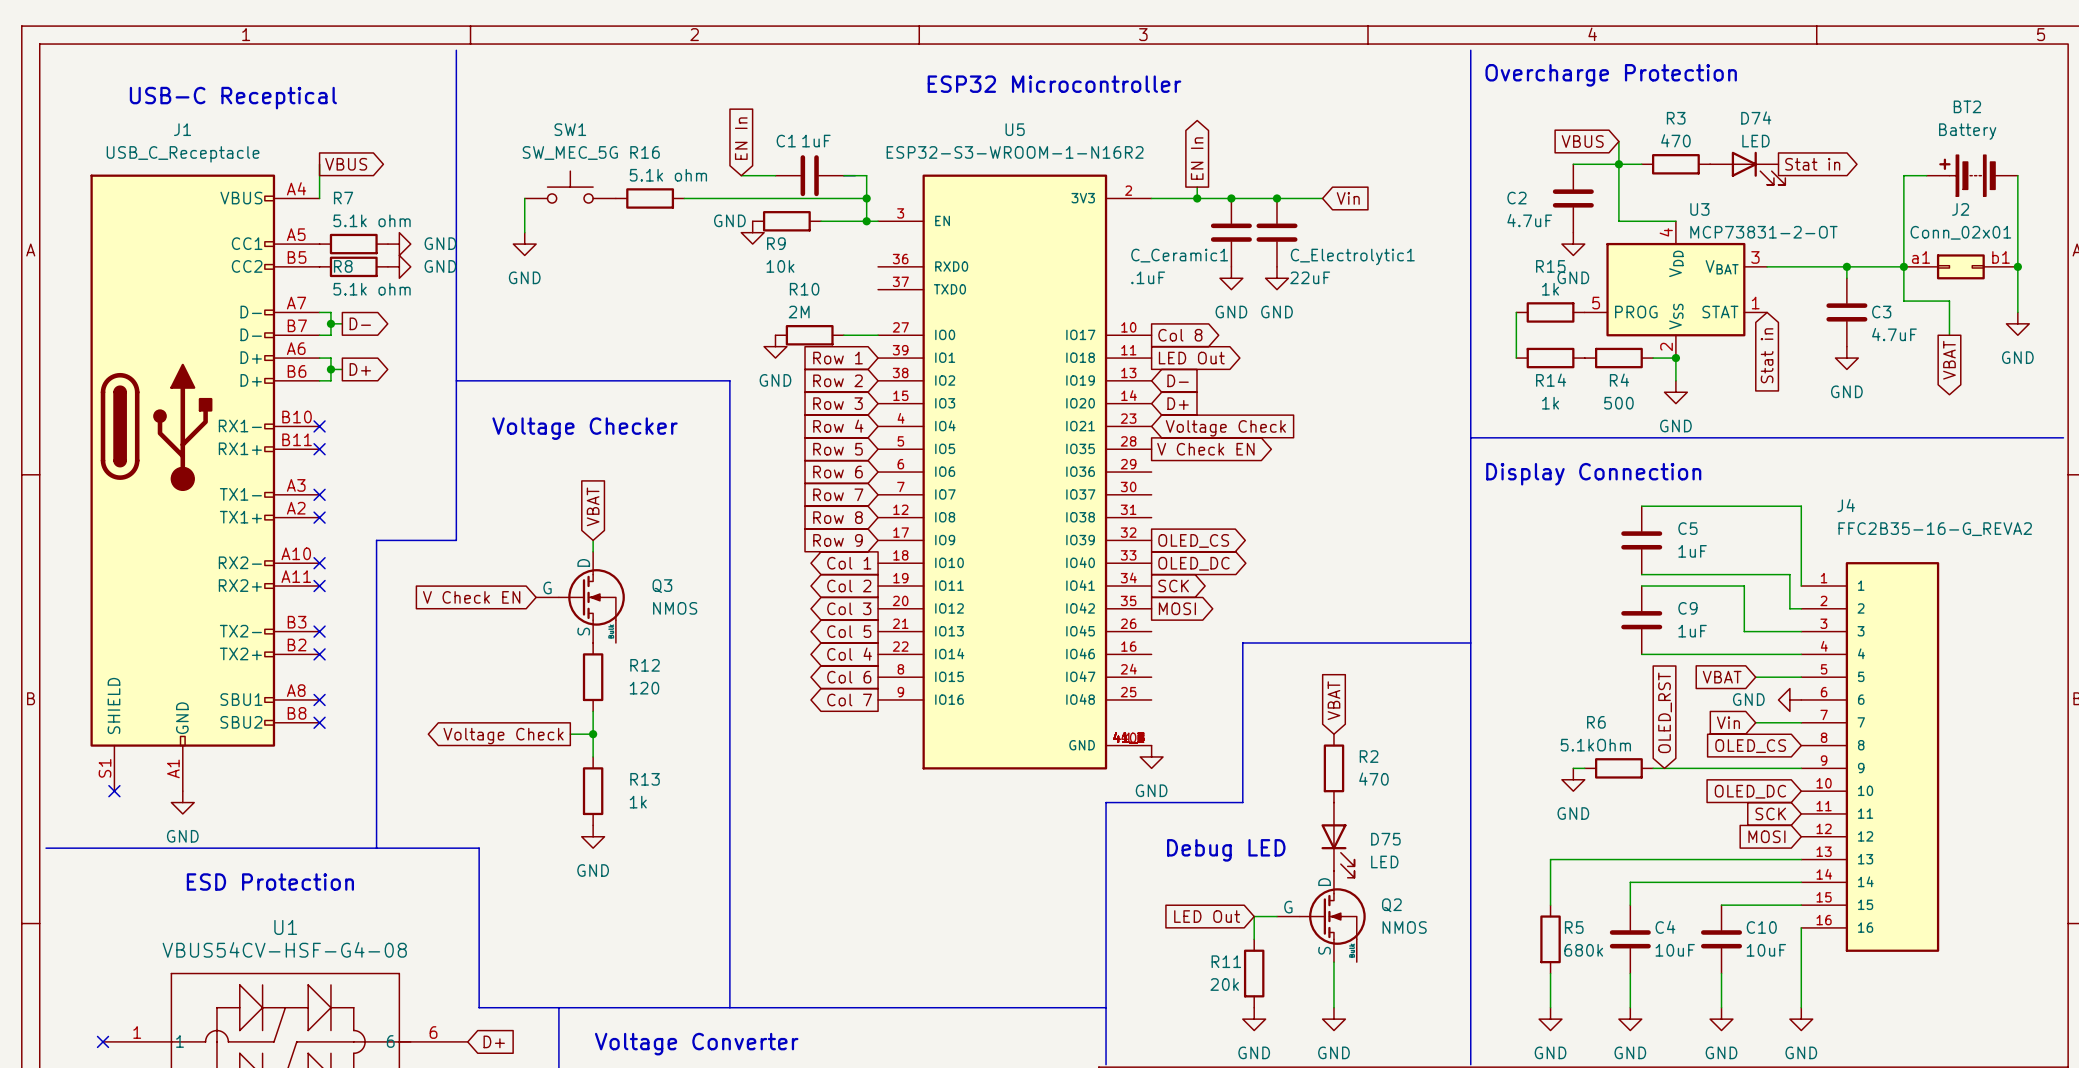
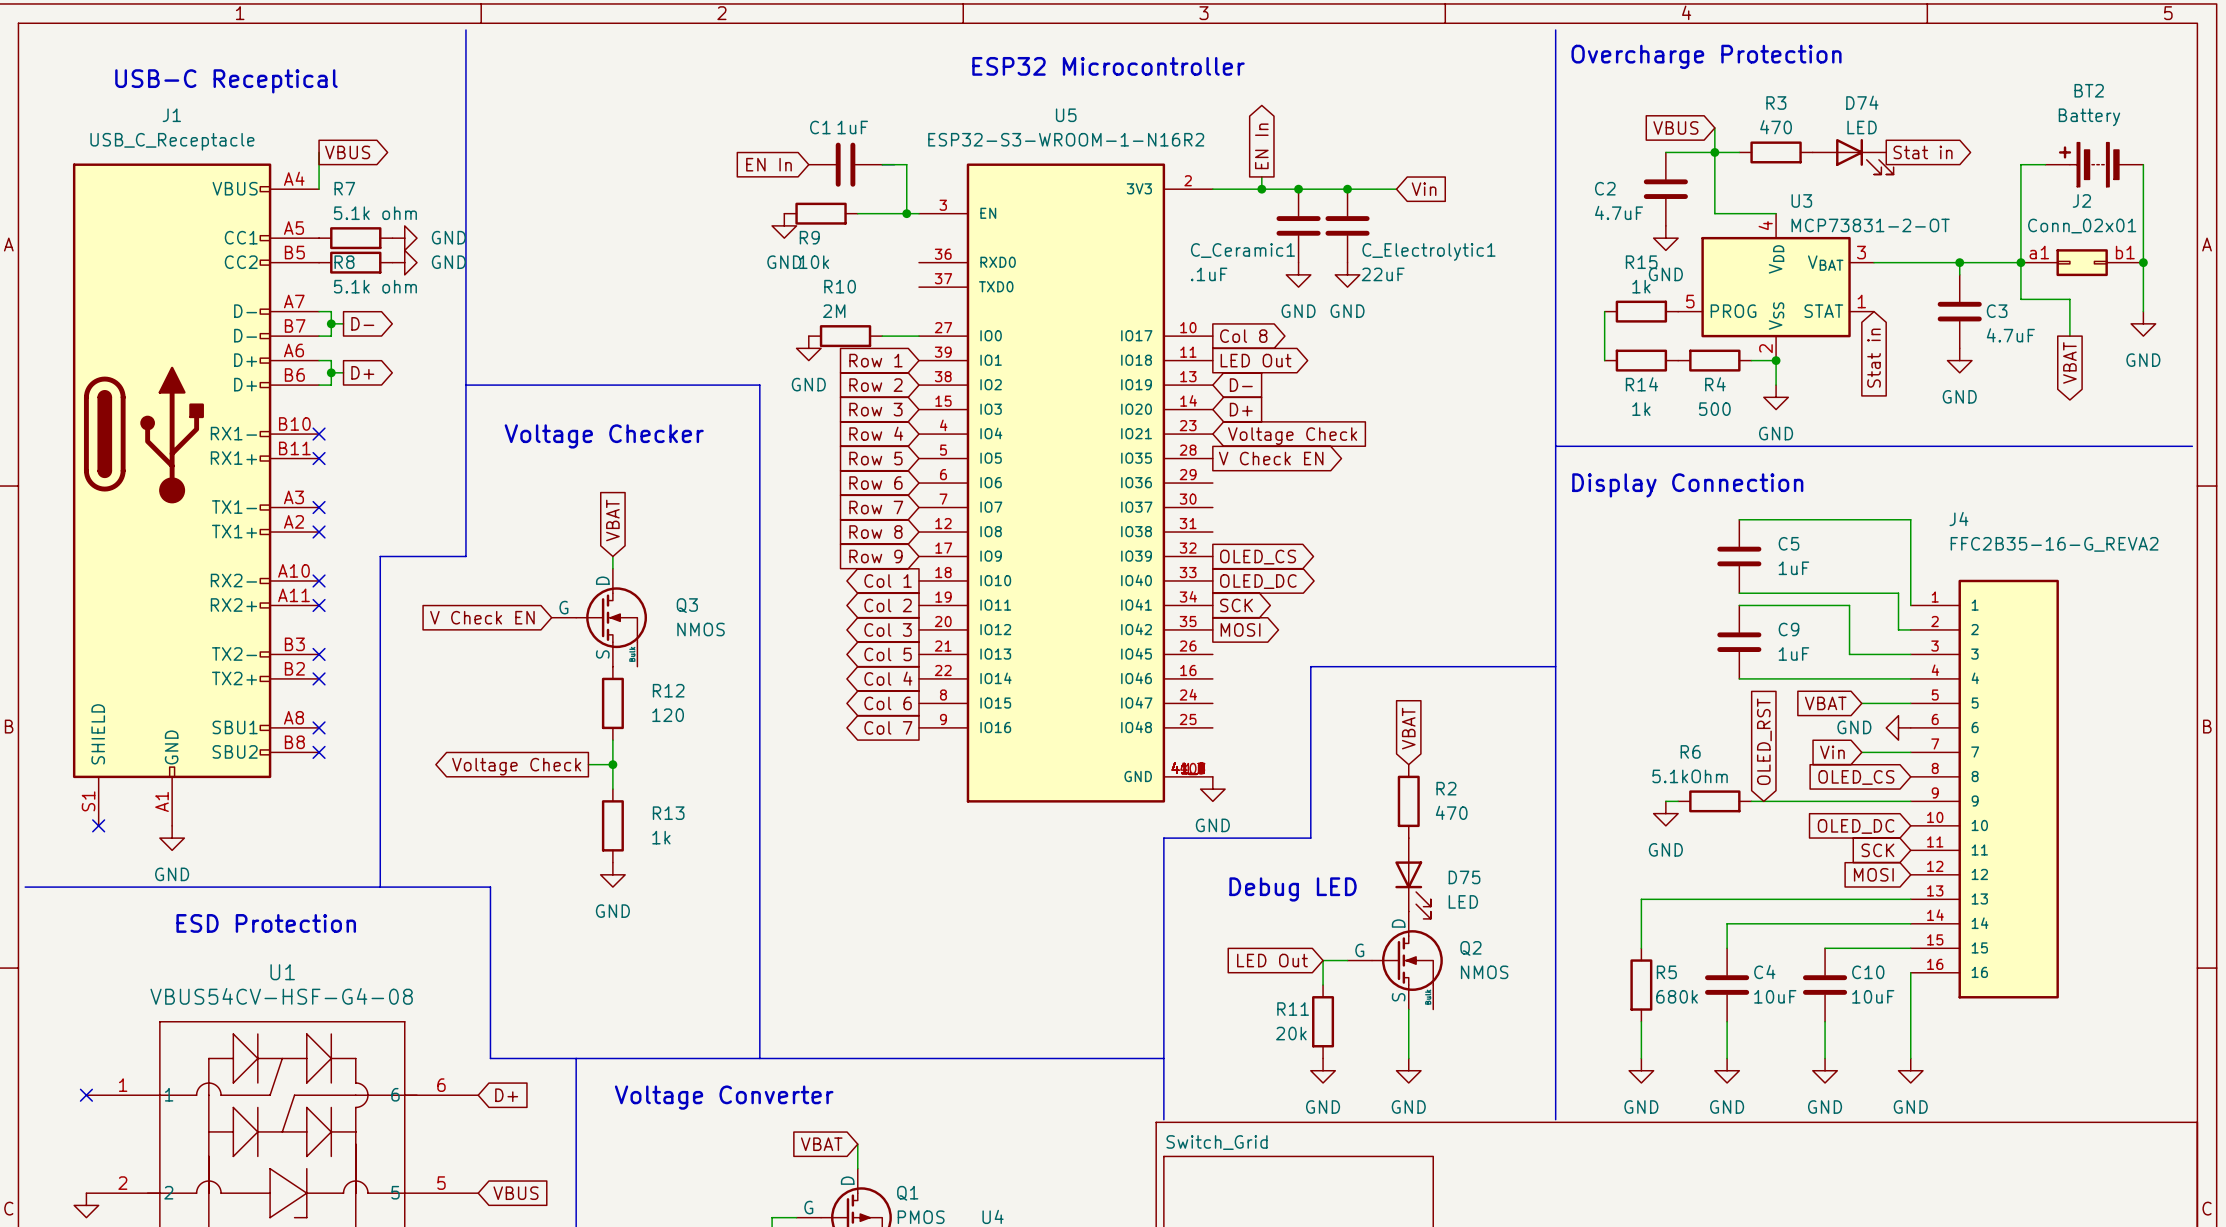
global label rotation: 0° (741, 138) -> 90° counterclockwise (768, 164)
wire: (741, 175) (775, 175) -> none
SW1: SW_MEC_5G (570, 187) -> none
wire: (524, 198) (524, 232) -> none
R16: 5.1k ohm (650, 198) -> none
wire: (684, 198) (866, 198) -> none
junction: (866, 198) -> none
power symbol text position: GND (729, 220) -> GND (784, 262)
power symbol: GND (524, 244) -> none

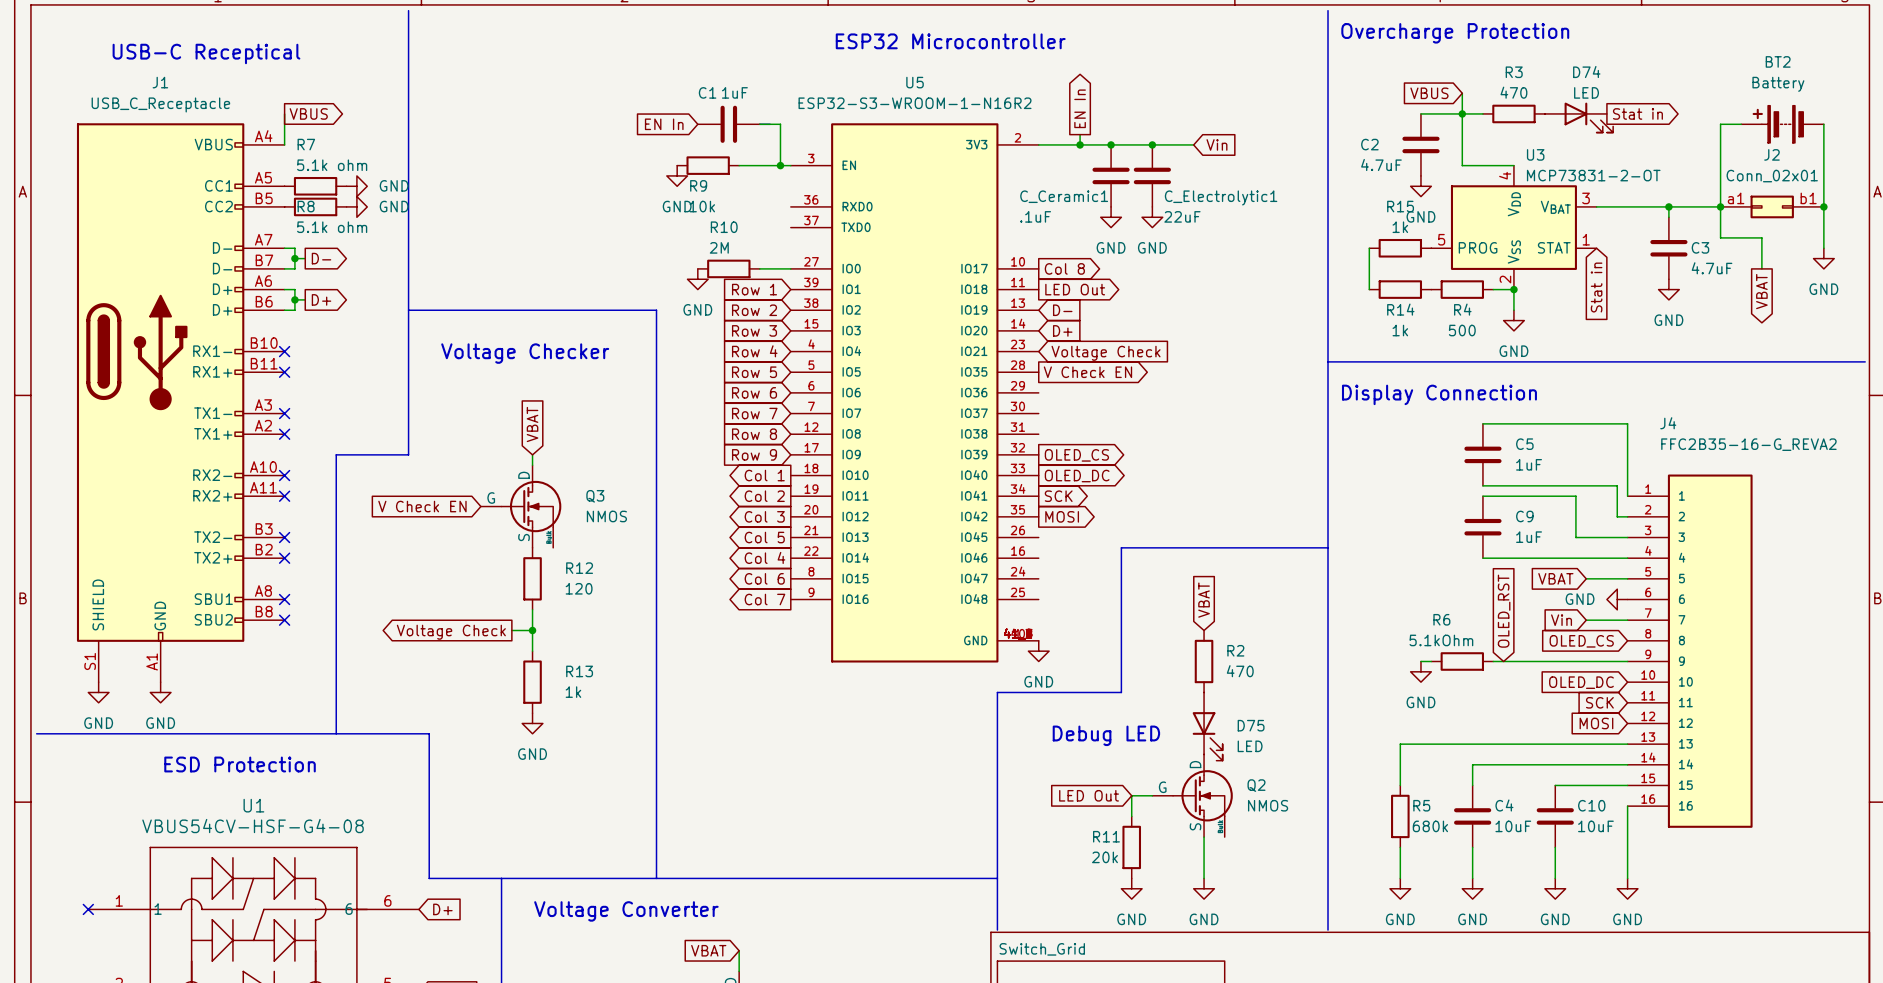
no-connect mark: (98, 825) -> none
power symbol: none -> GND (98, 692)

